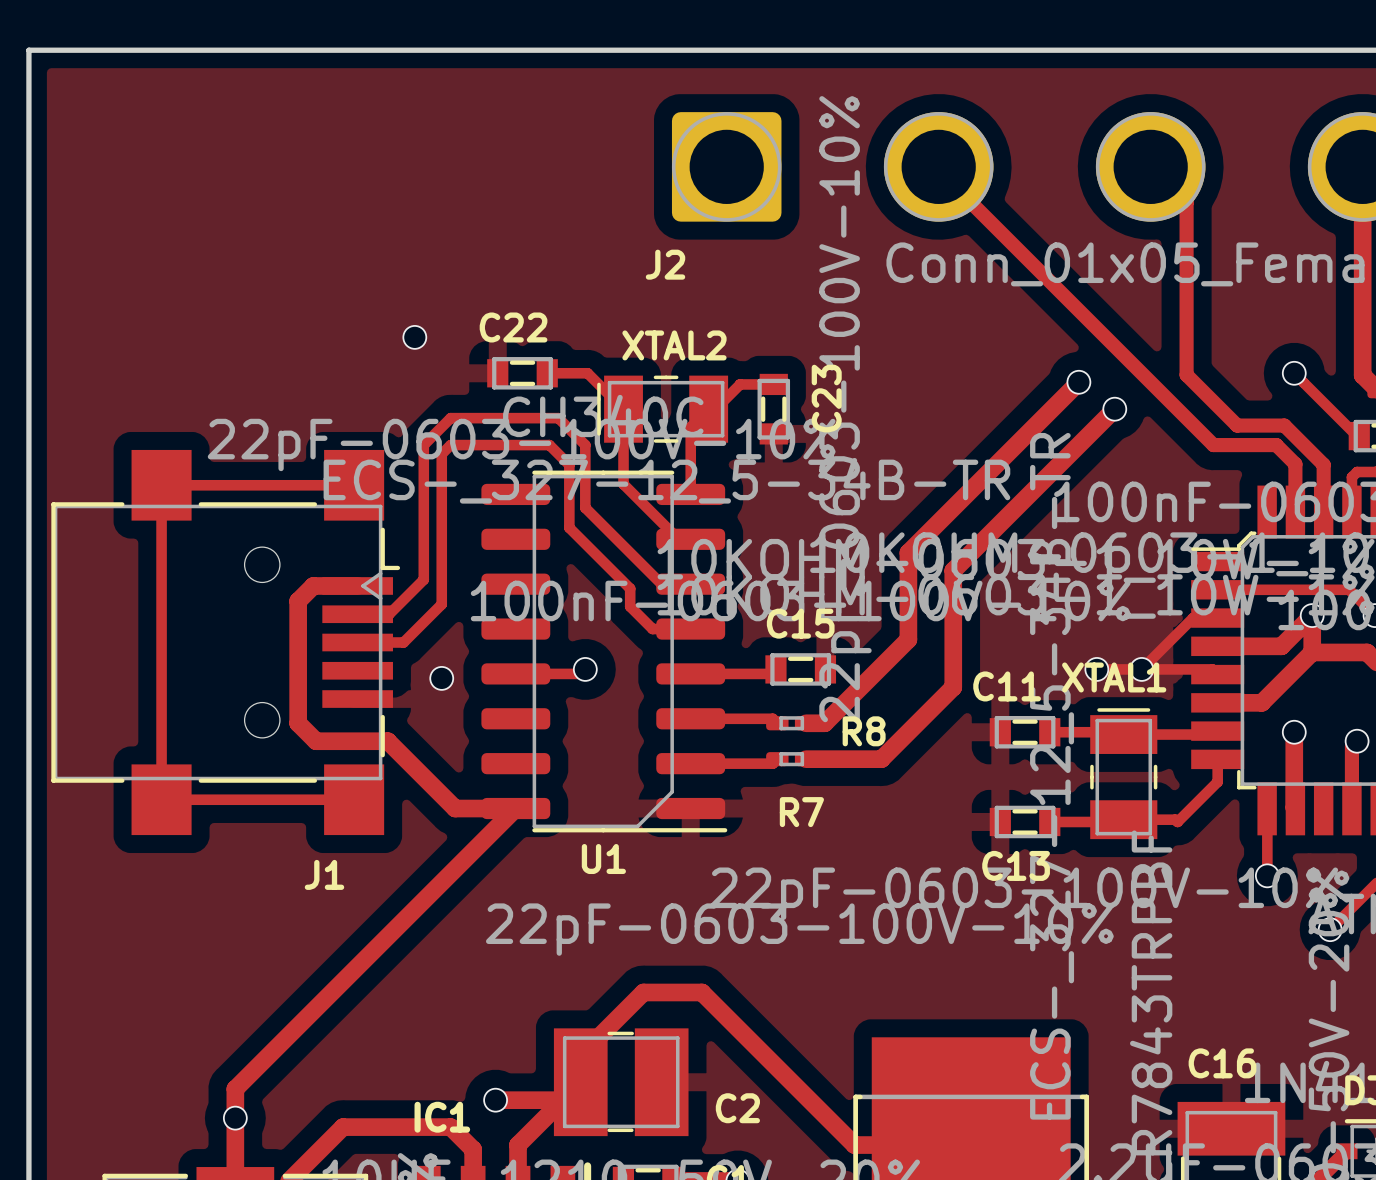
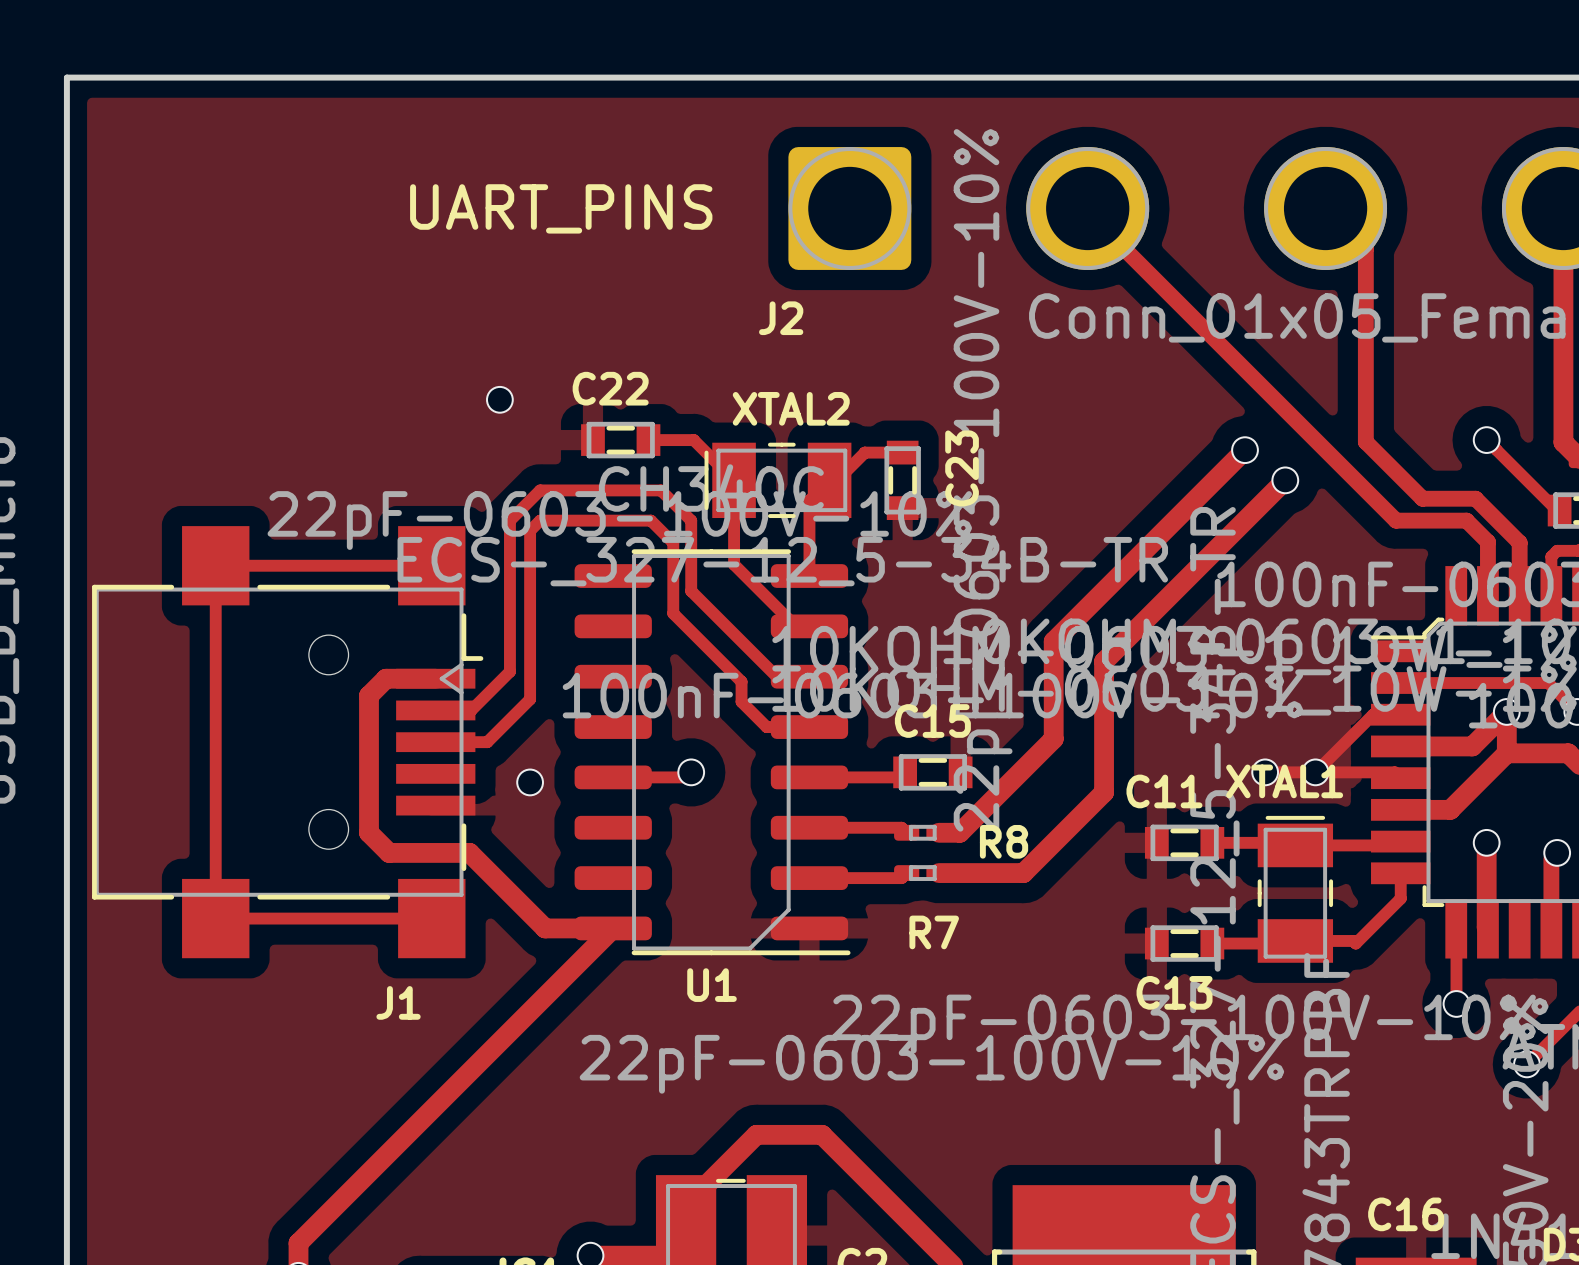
text: none -> UART_PINS (561, 208)

